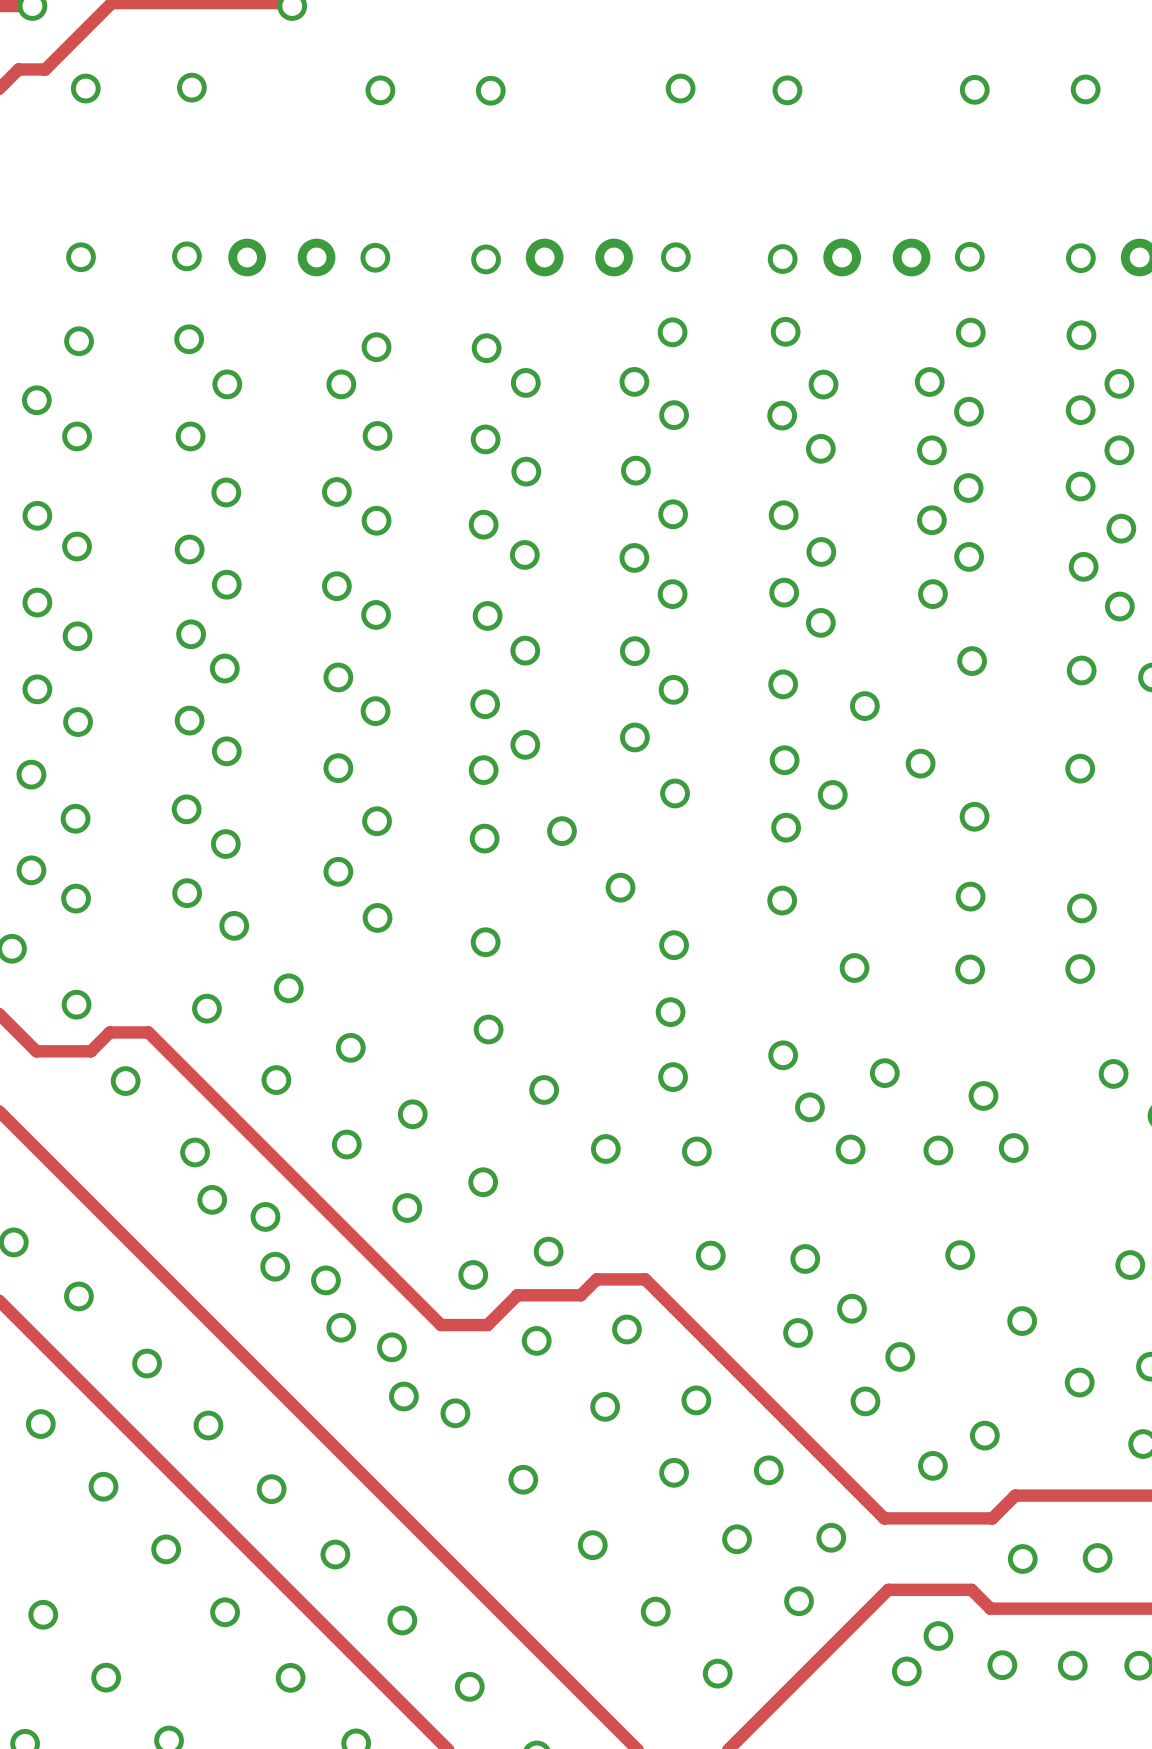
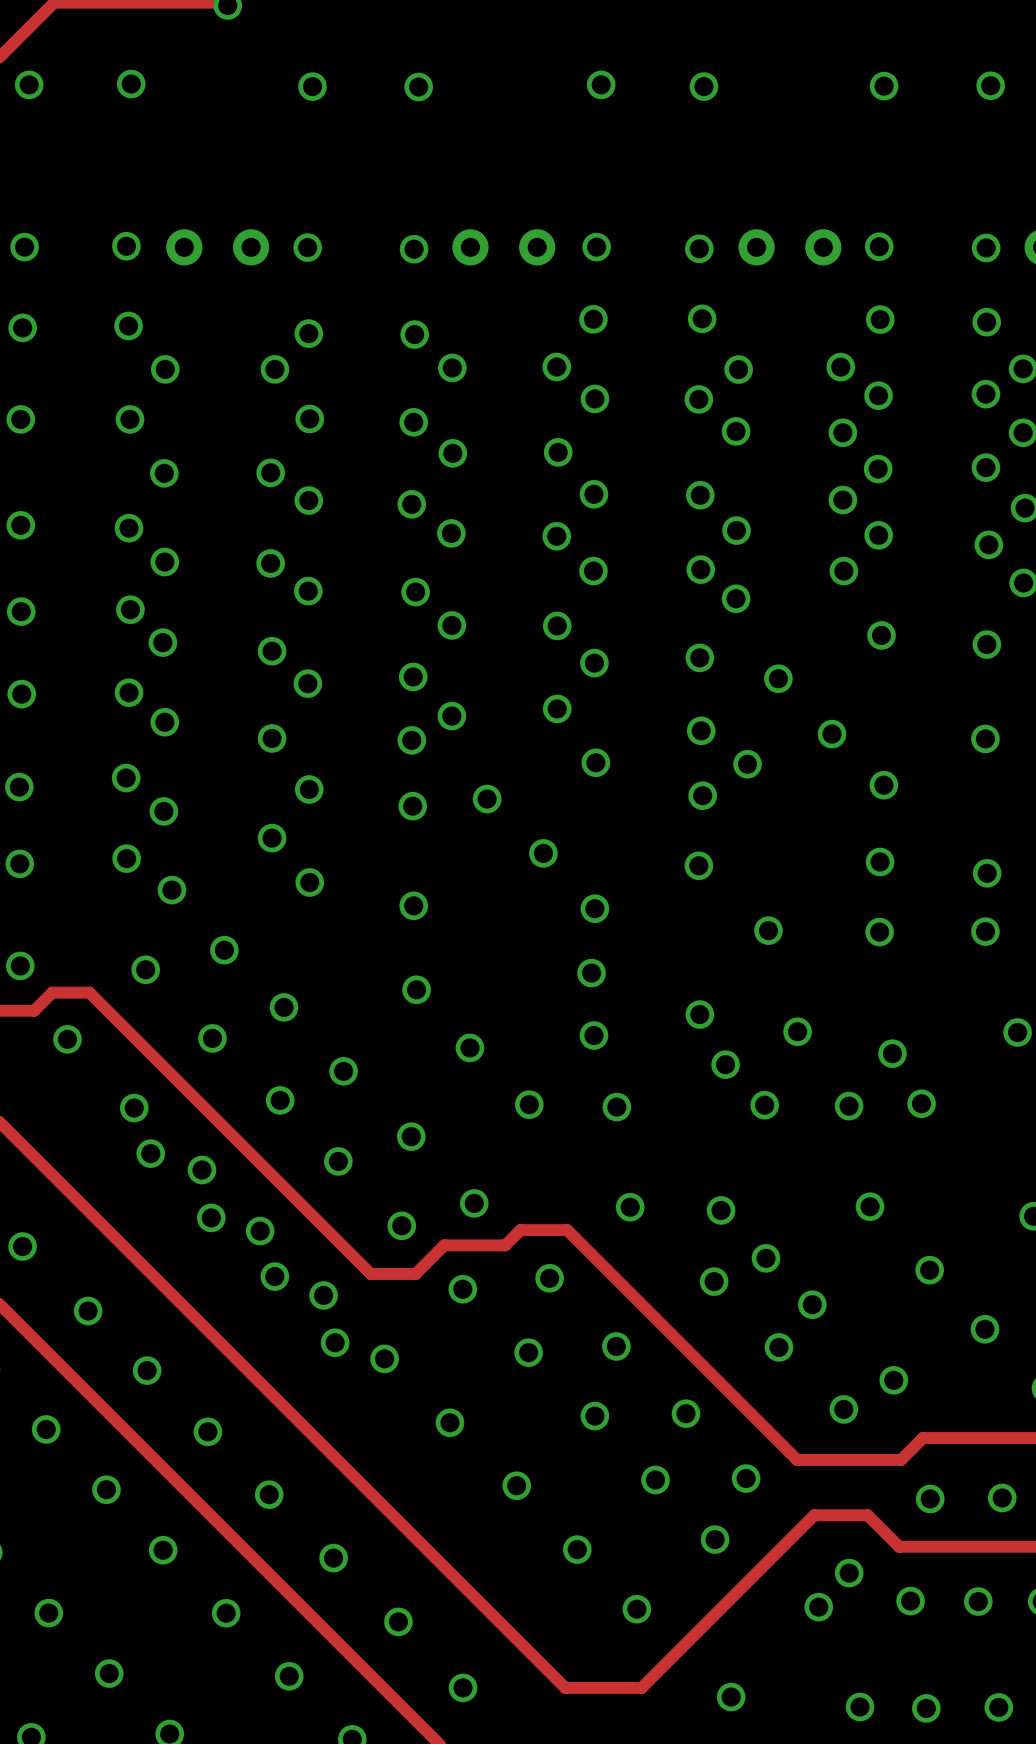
track: (888, 1589) (971, 1589) -> (800, 1528) (814, 1515) (867, 1515) (881, 1528)

